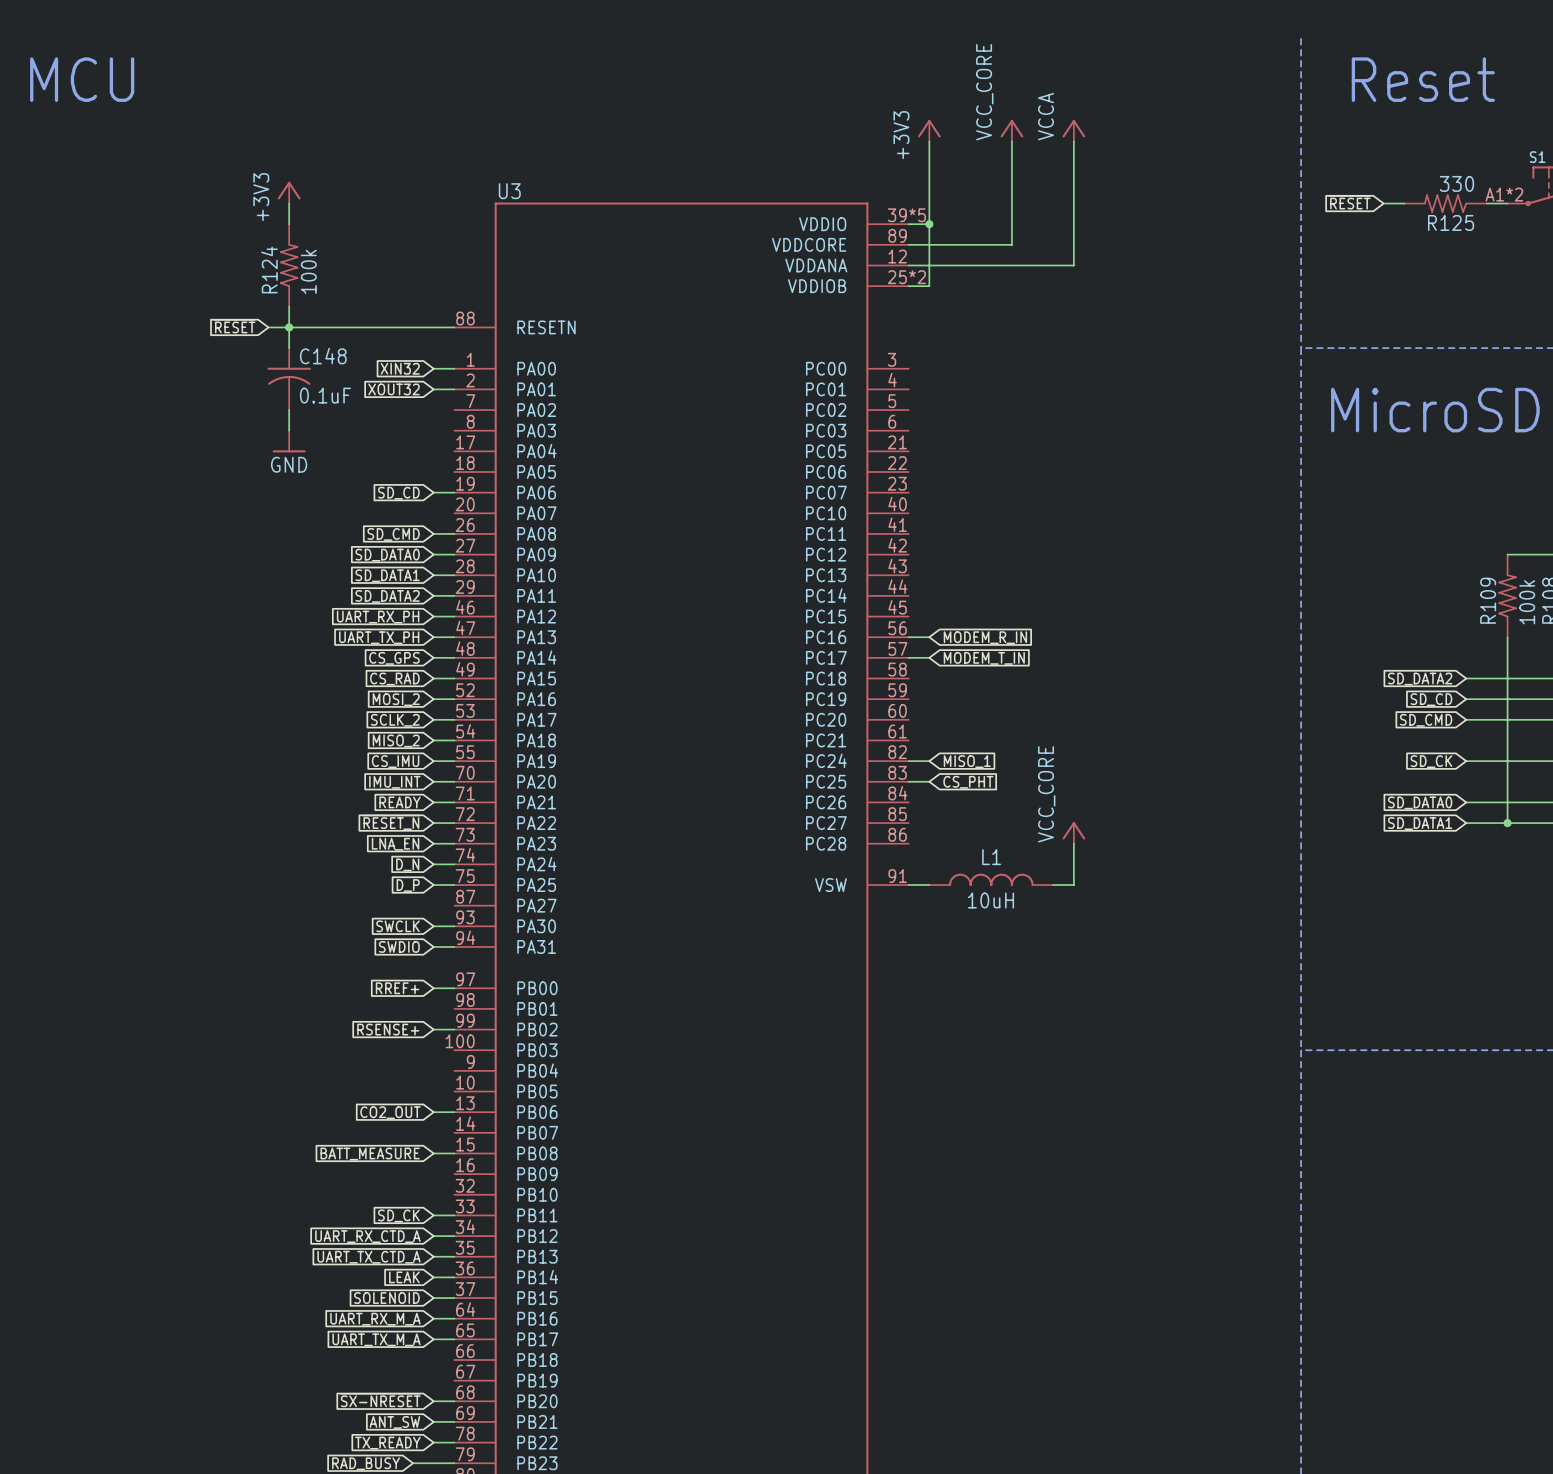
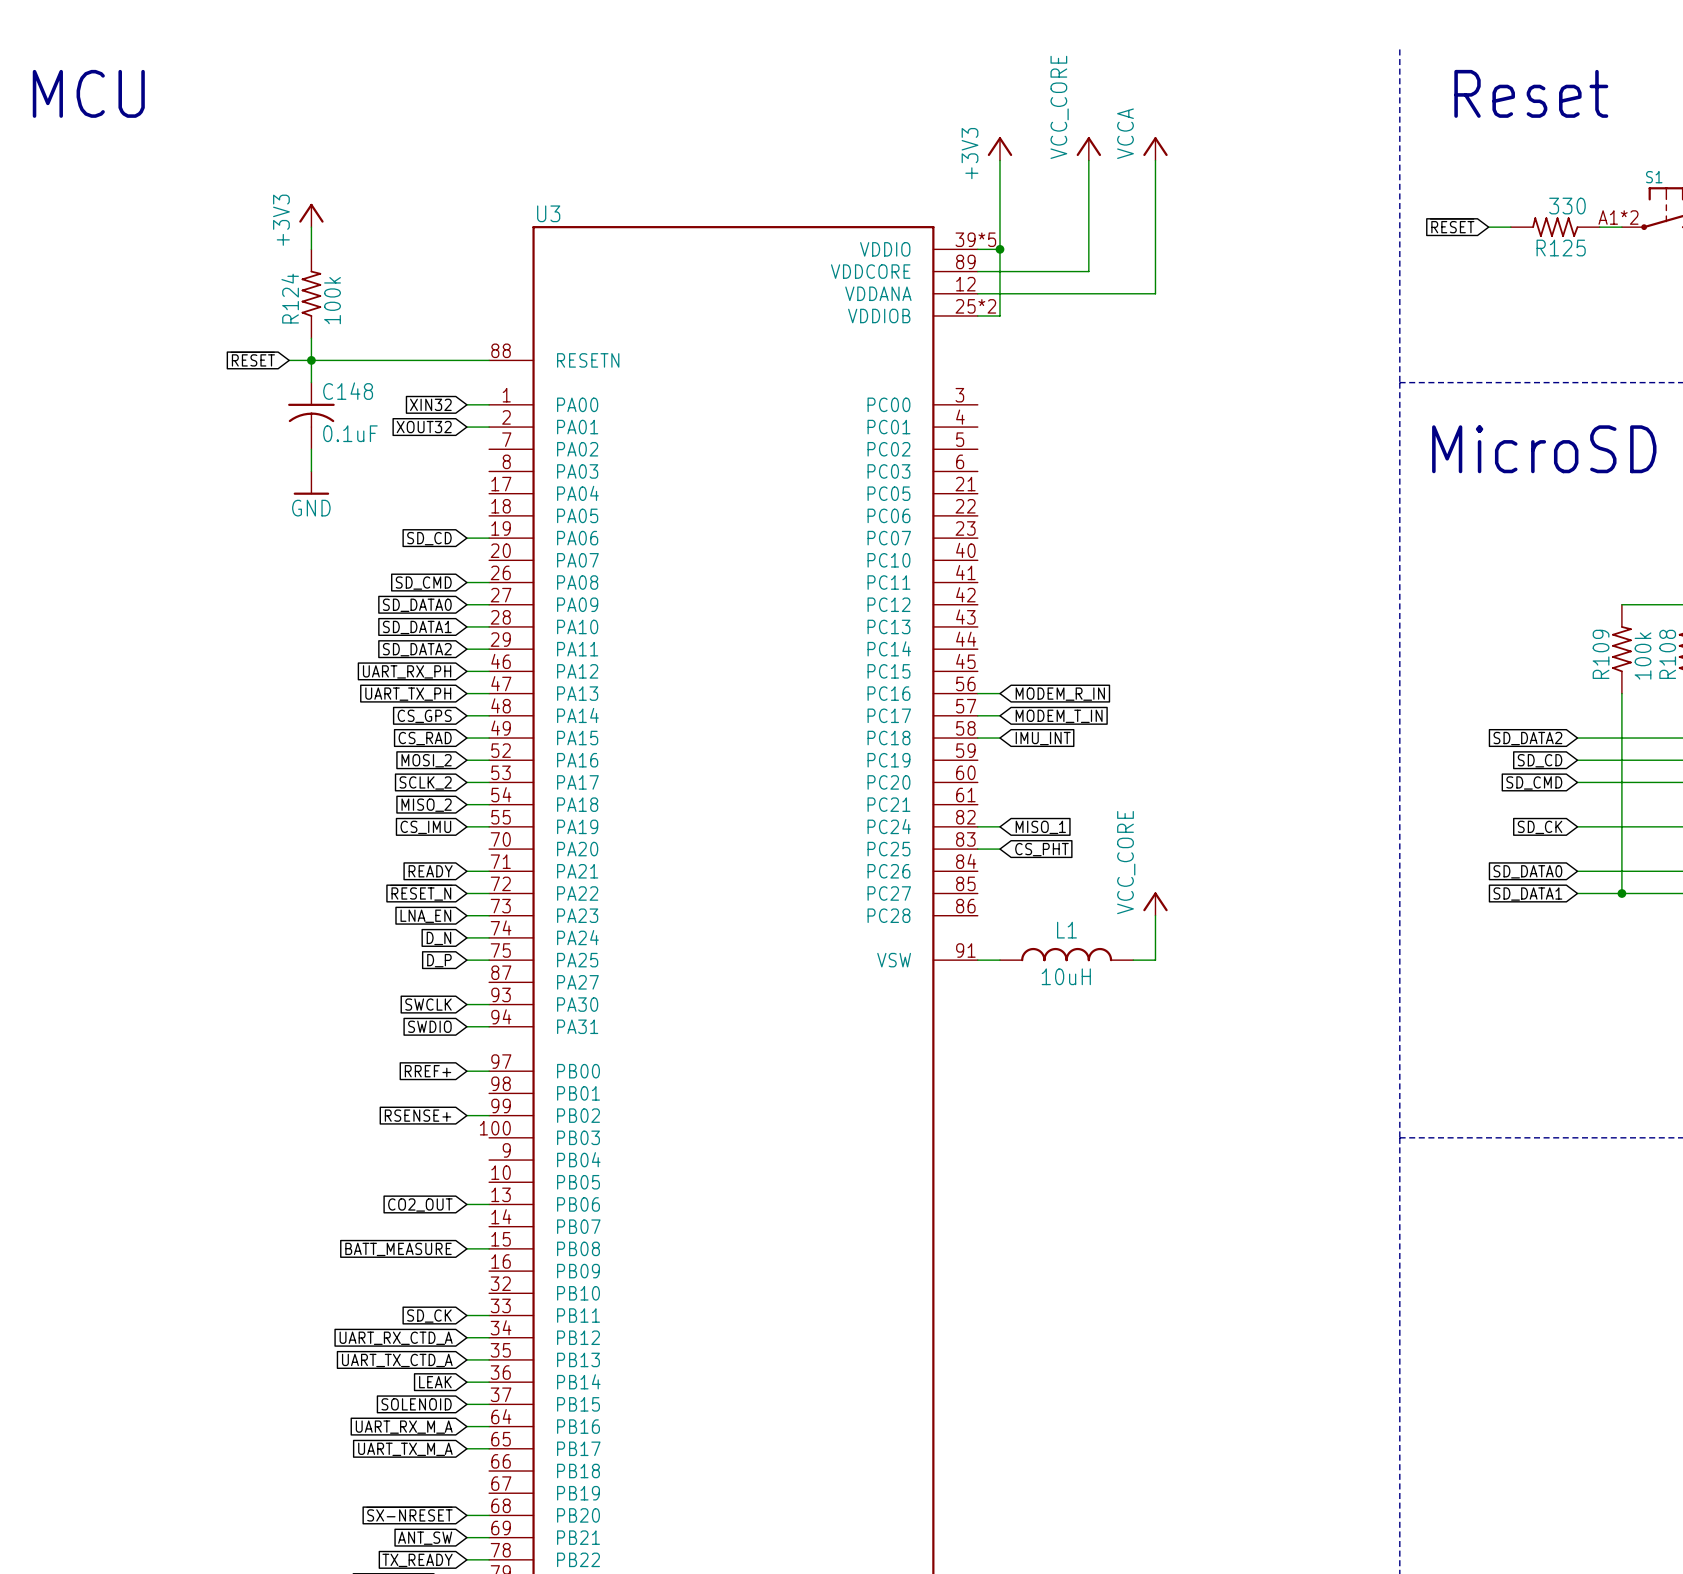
wire: none -> (977, 738) (999, 738)
global label: none -> IMU_INT (1043, 738)
wire: (433, 781) (454, 781) -> none
global label: IMU_INT (394, 782) -> none

